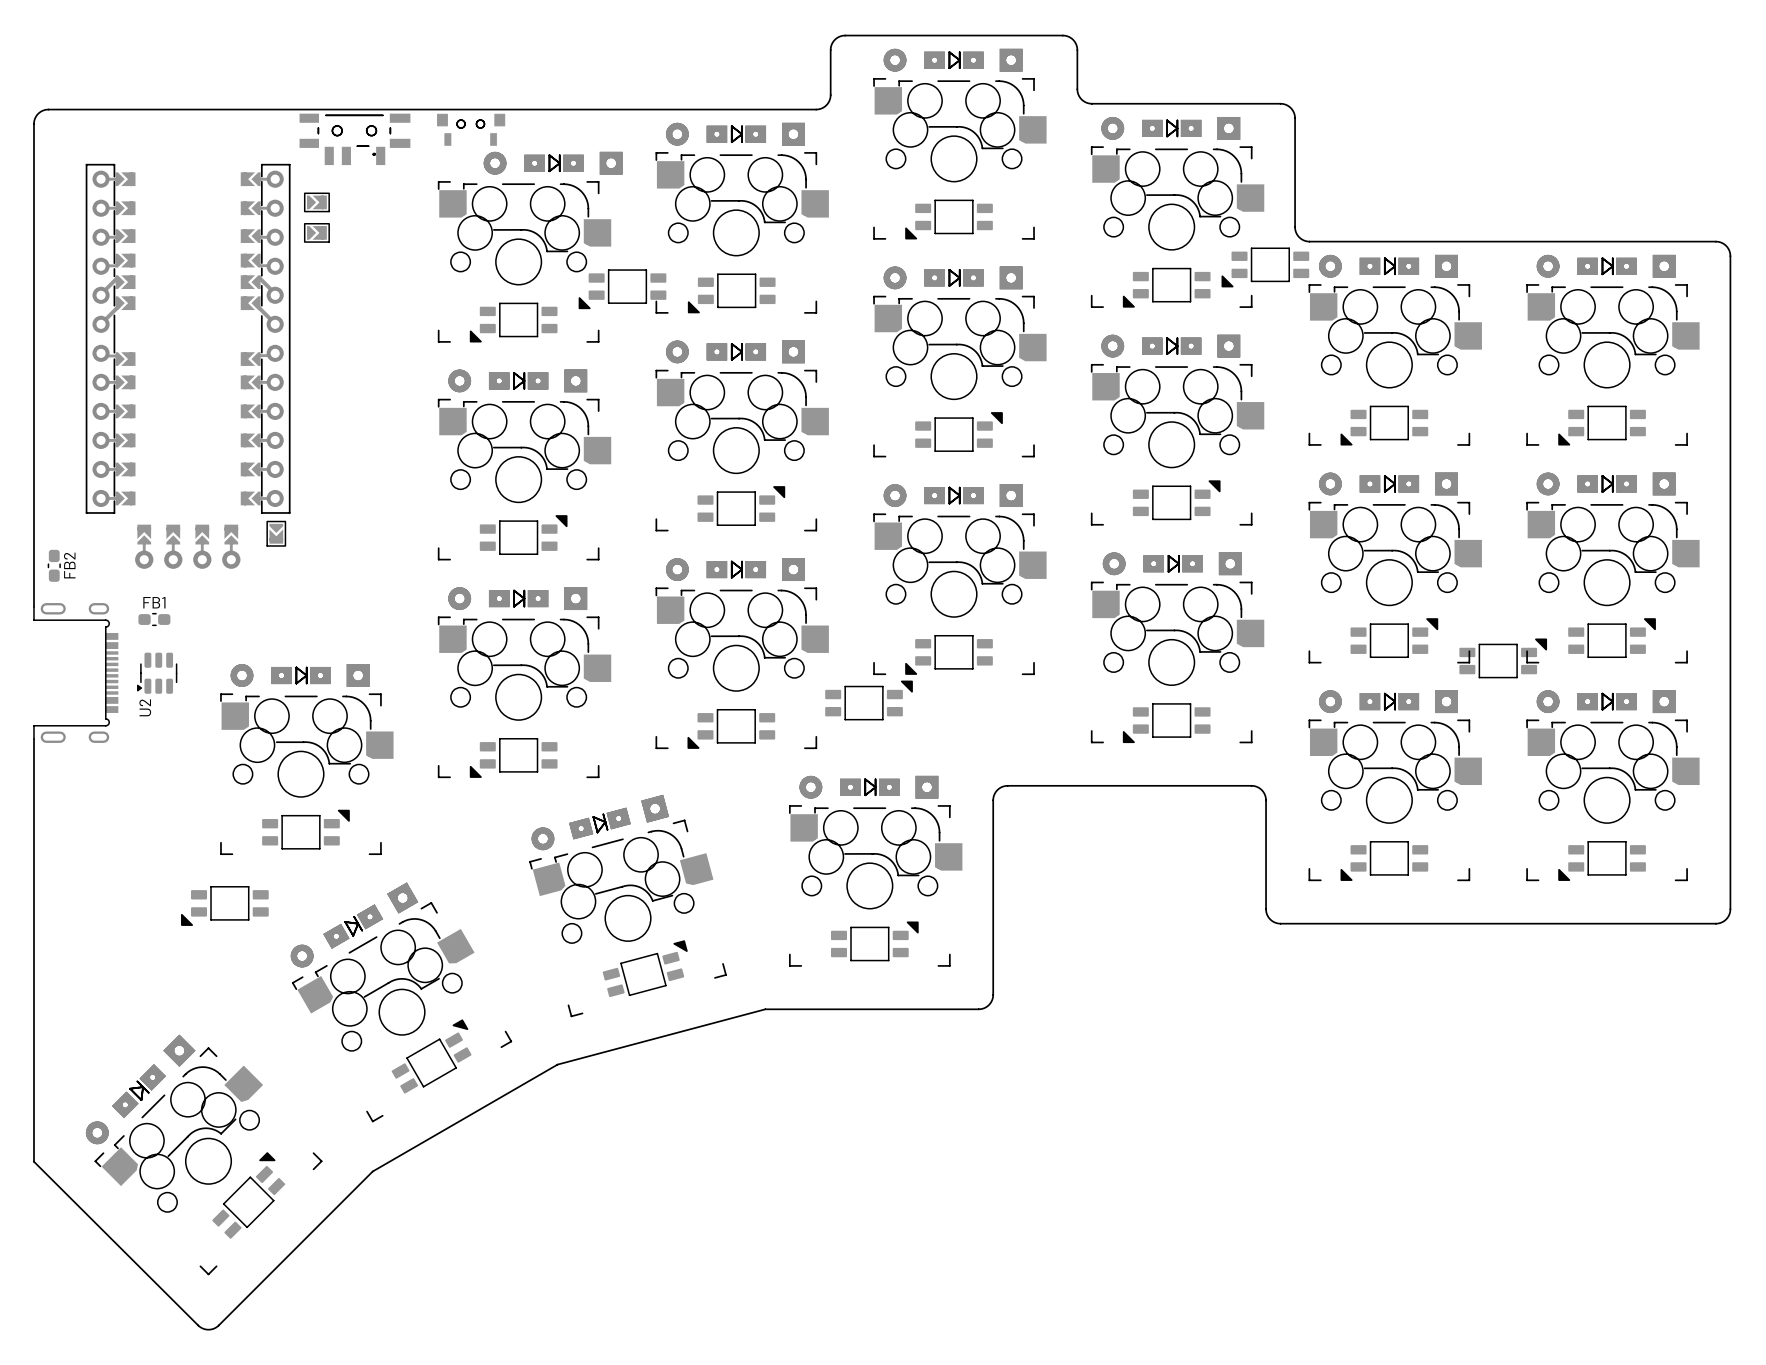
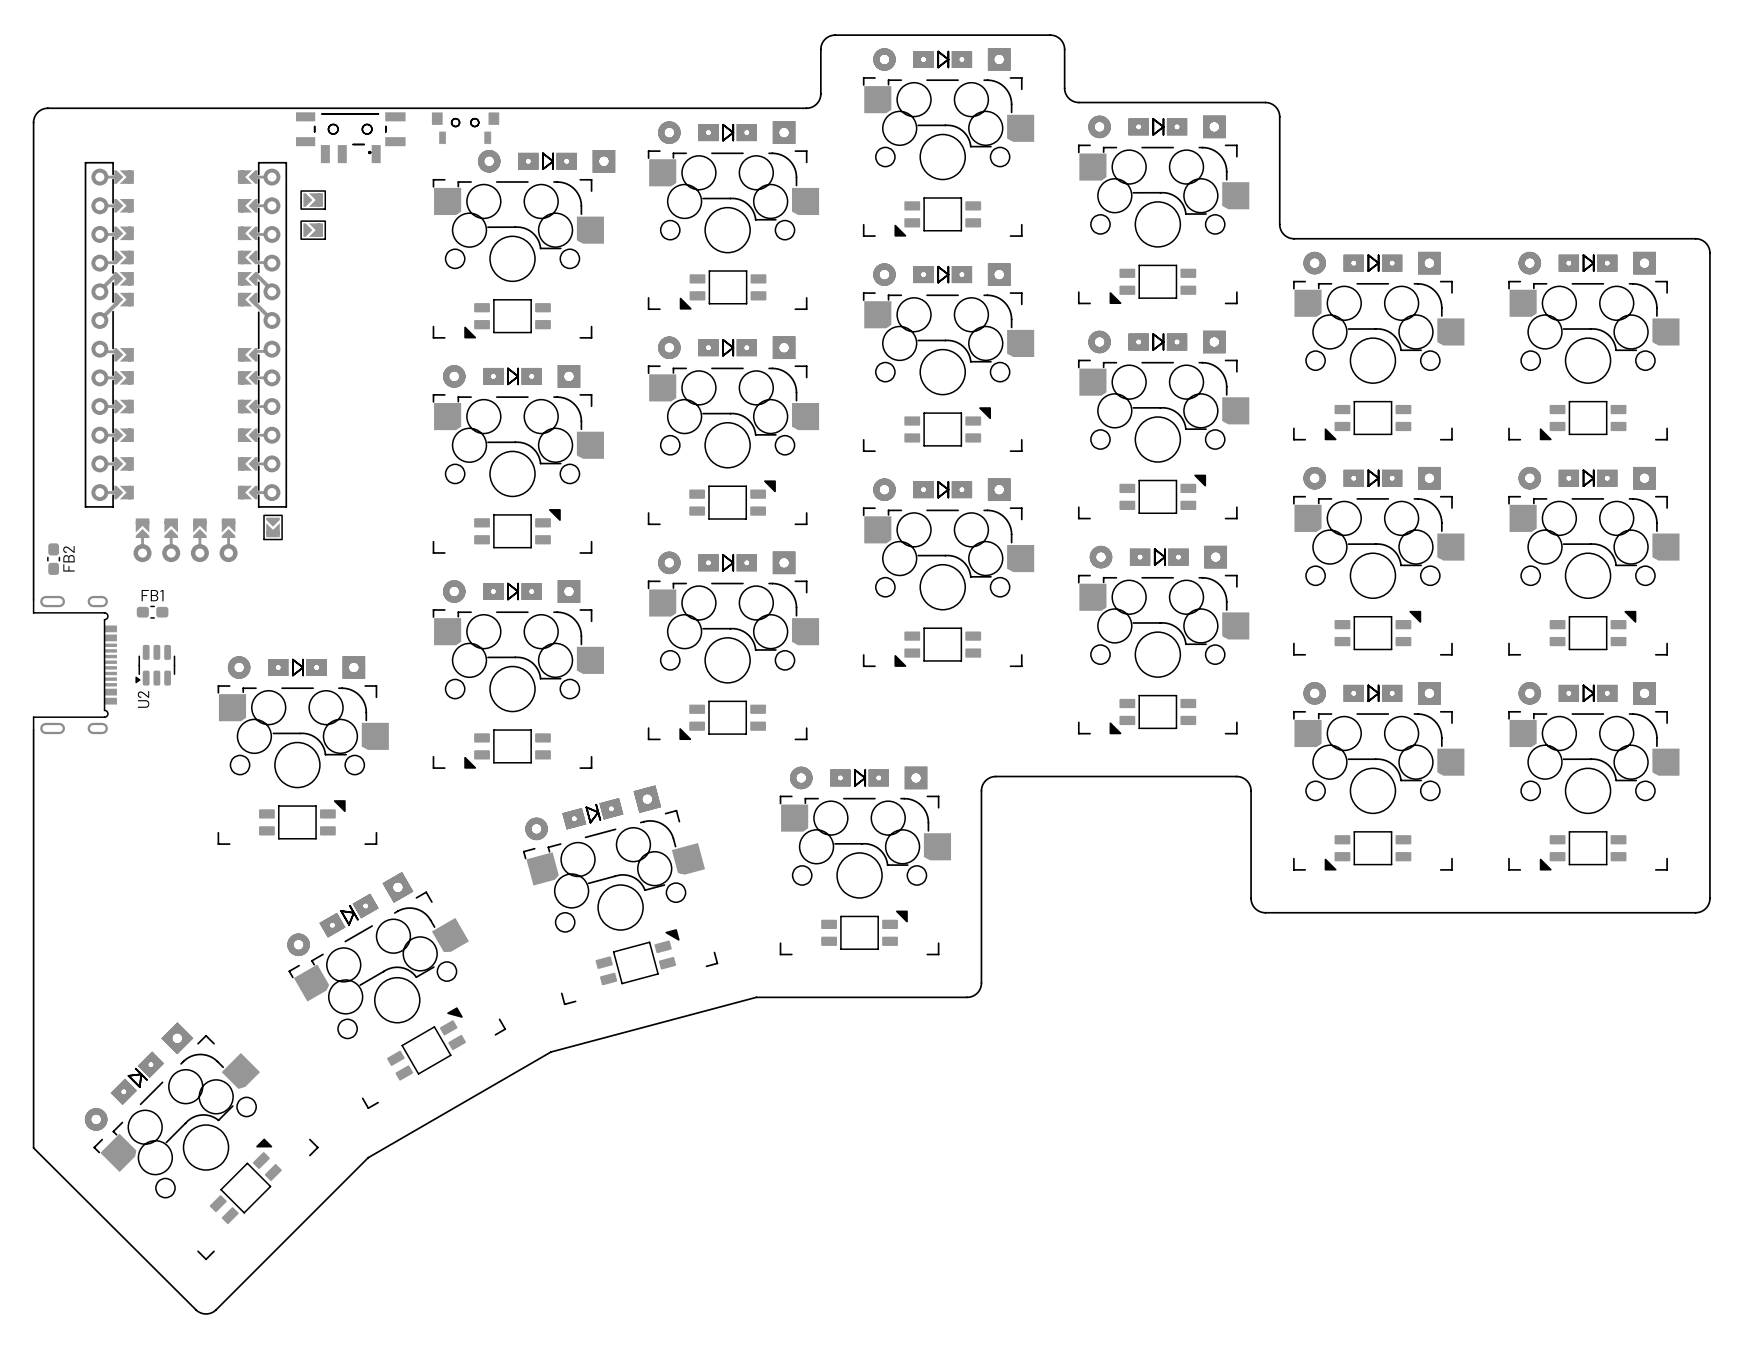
part: (1265, 267) -> none
part: (622, 289) -> none
part: (1503, 658) -> none
part: (869, 700) -> none
part: (224, 906) -> none

